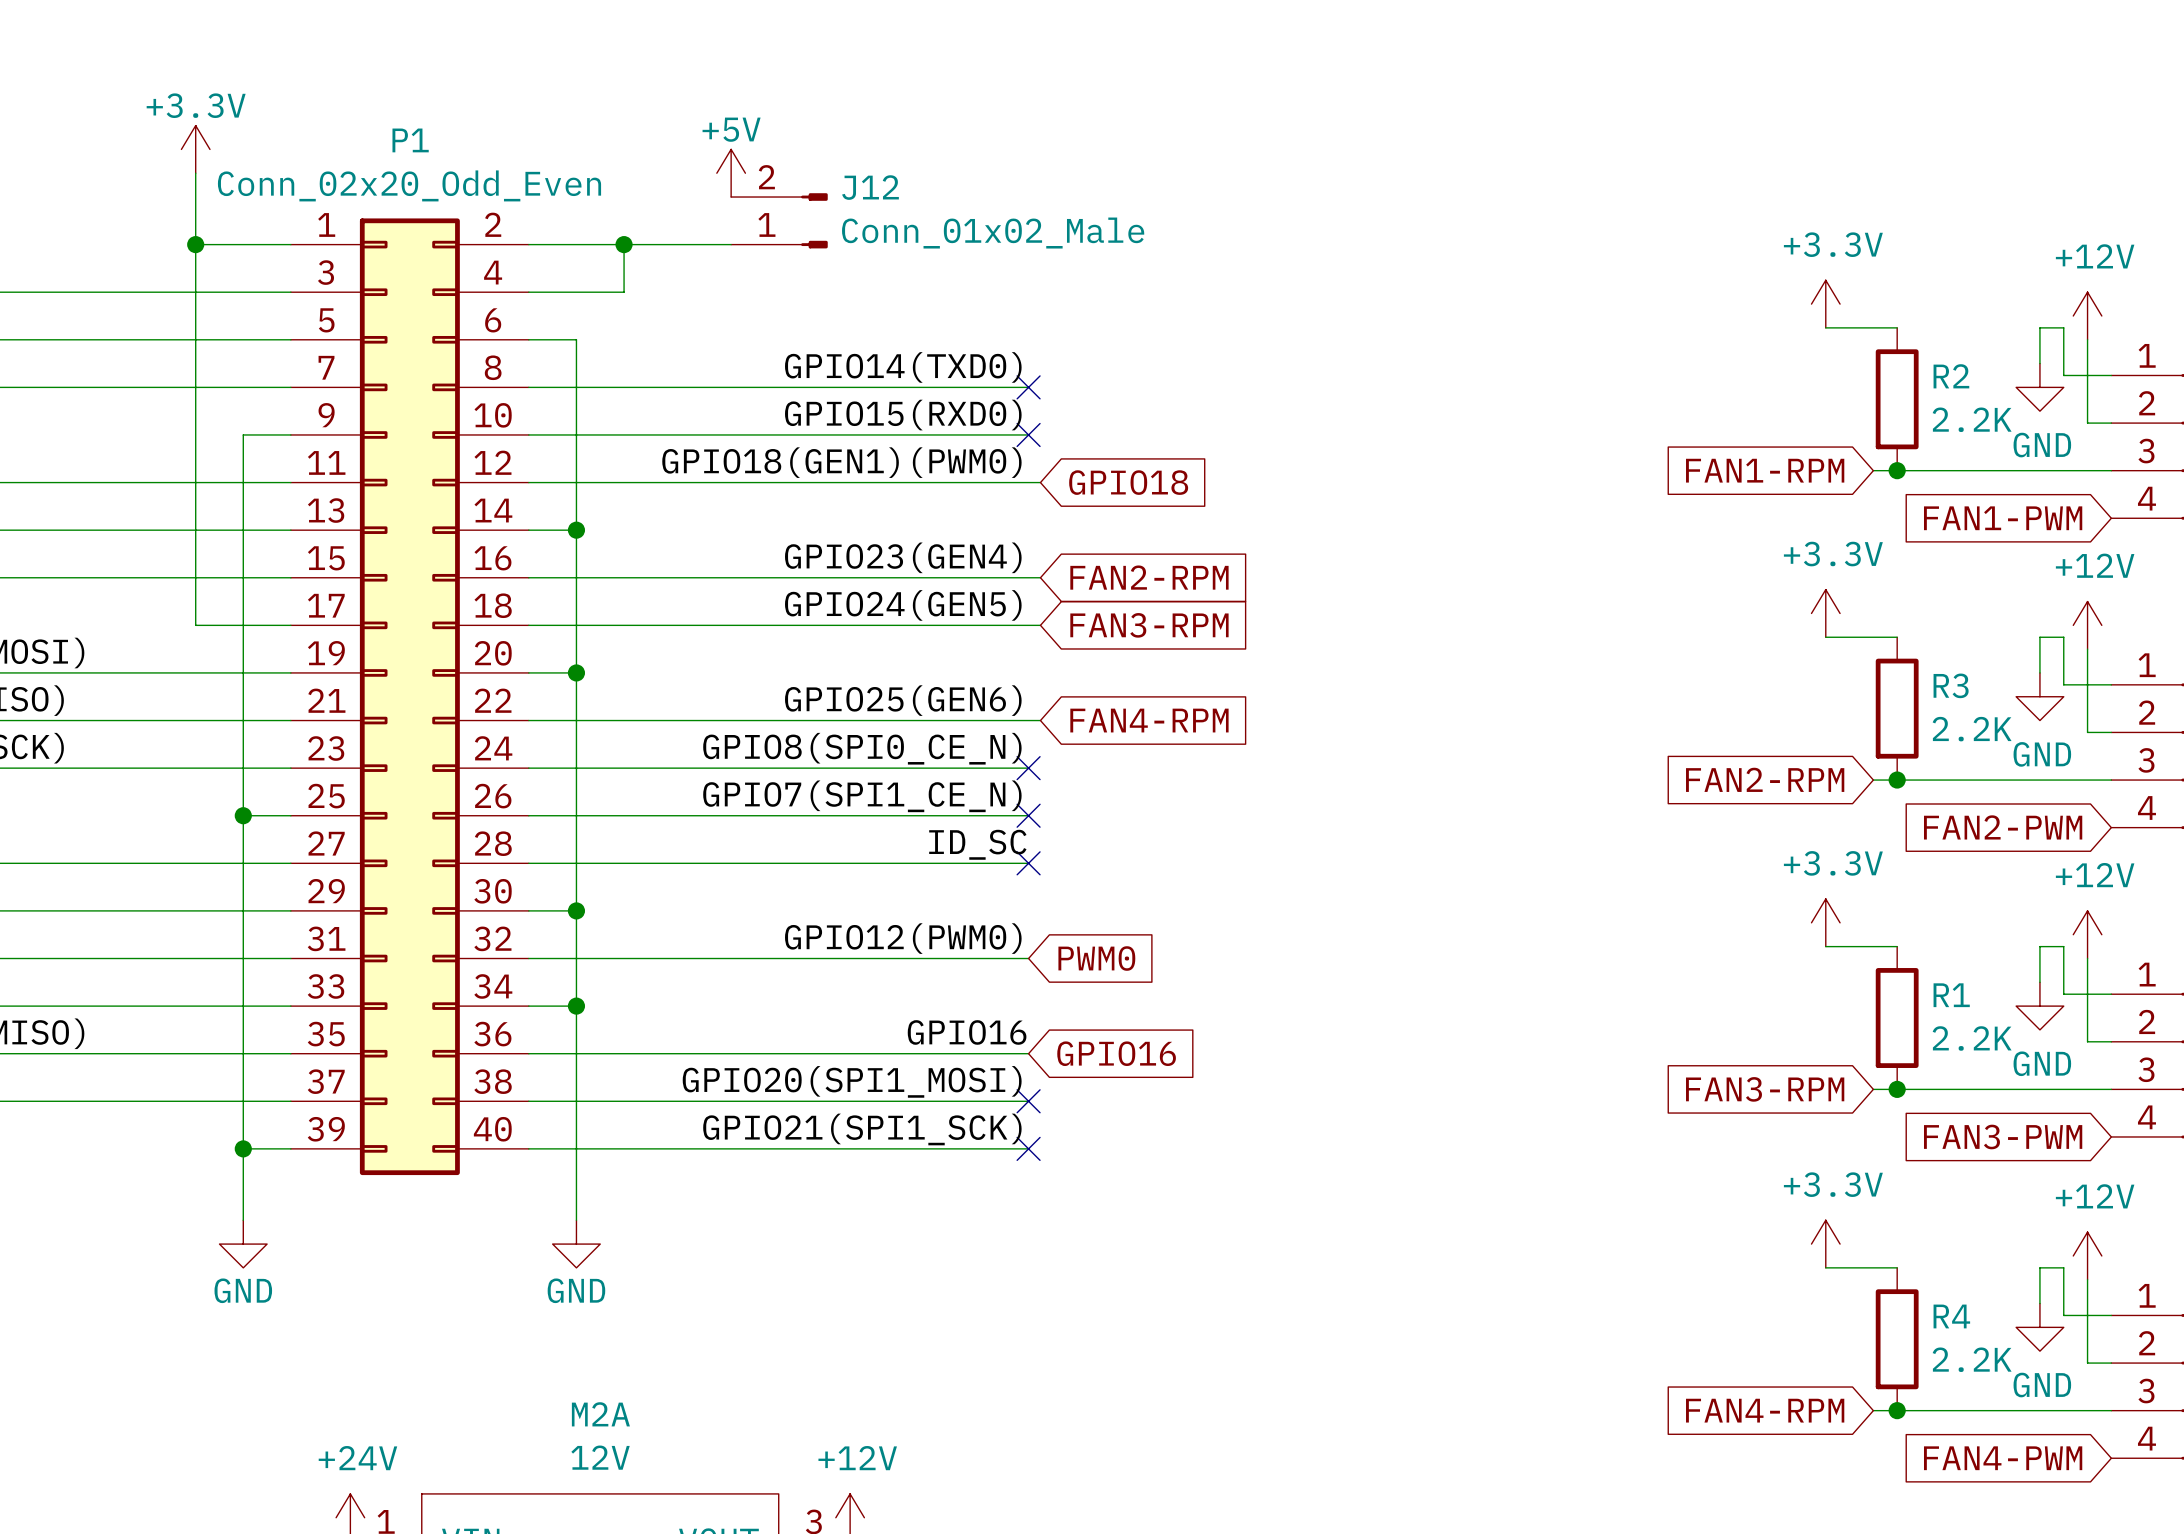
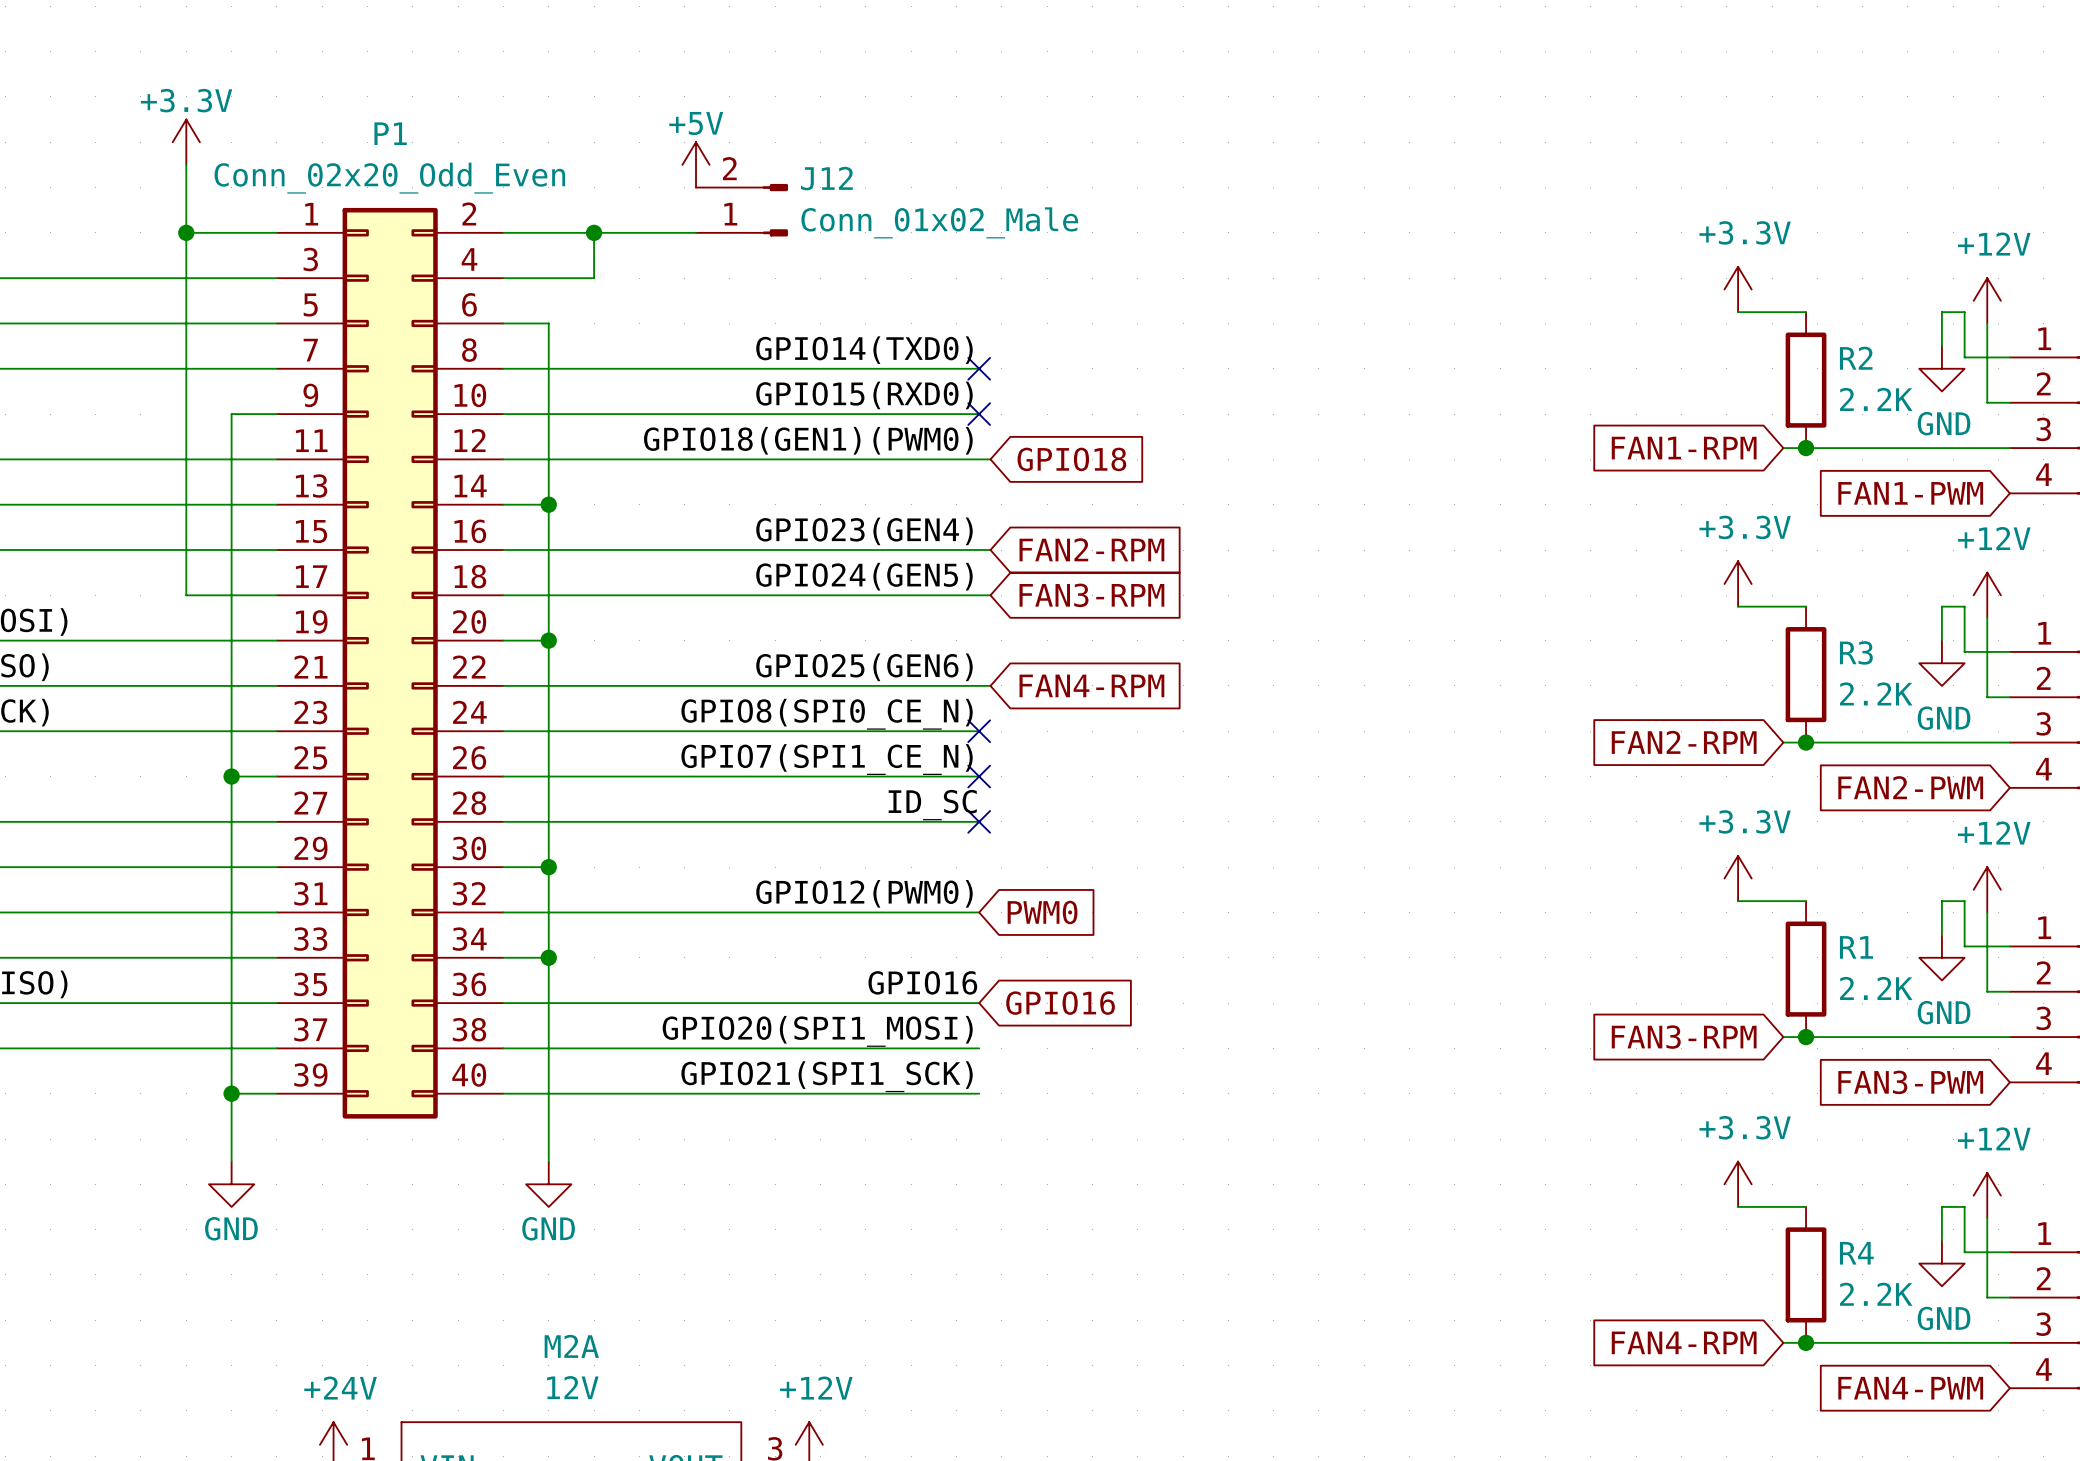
no-connect mark: (1028, 1101) -> none
no-connect mark: (1028, 1148) -> none

